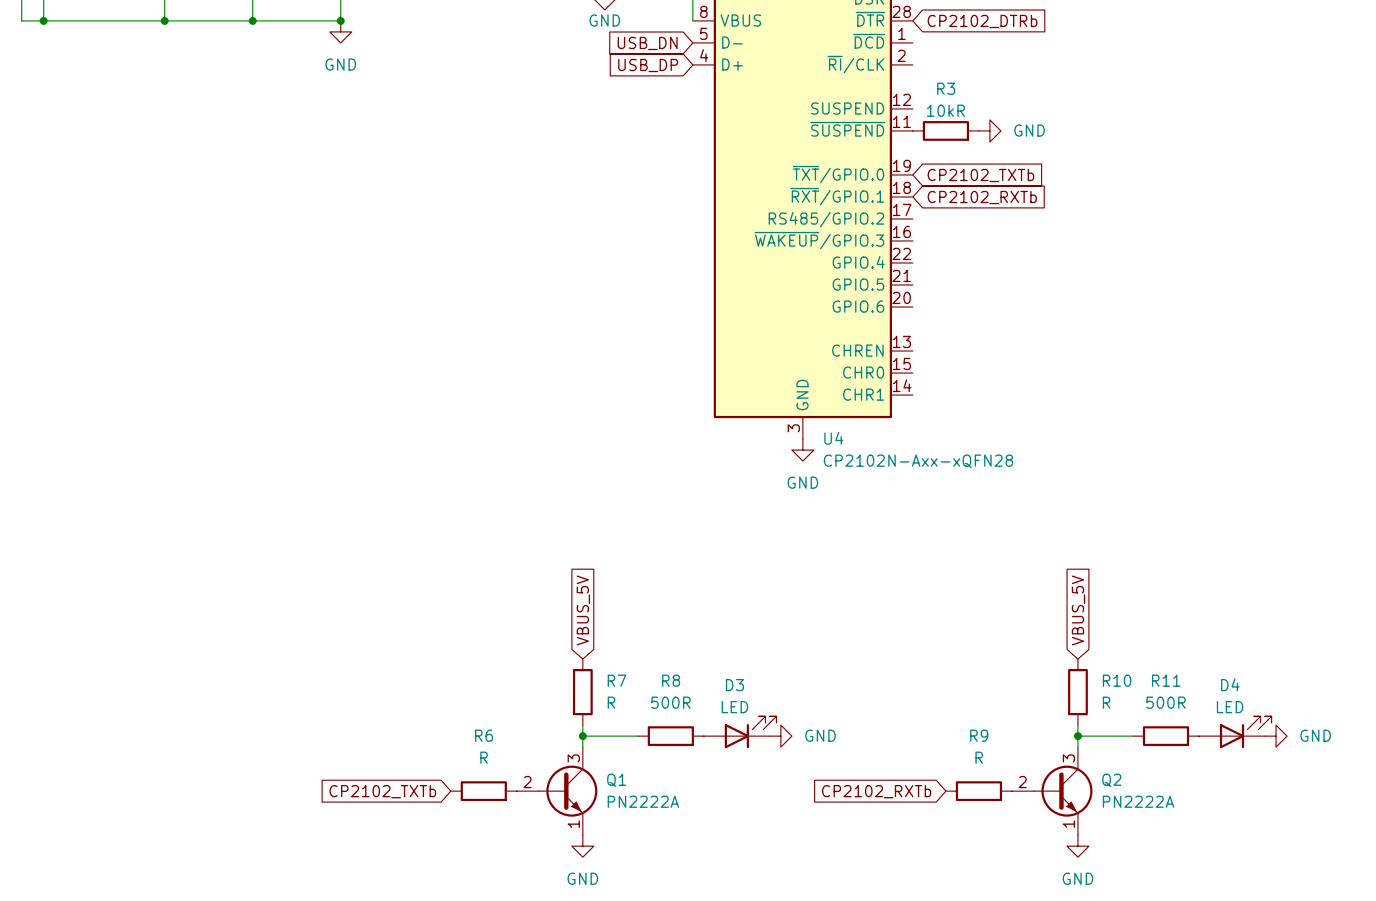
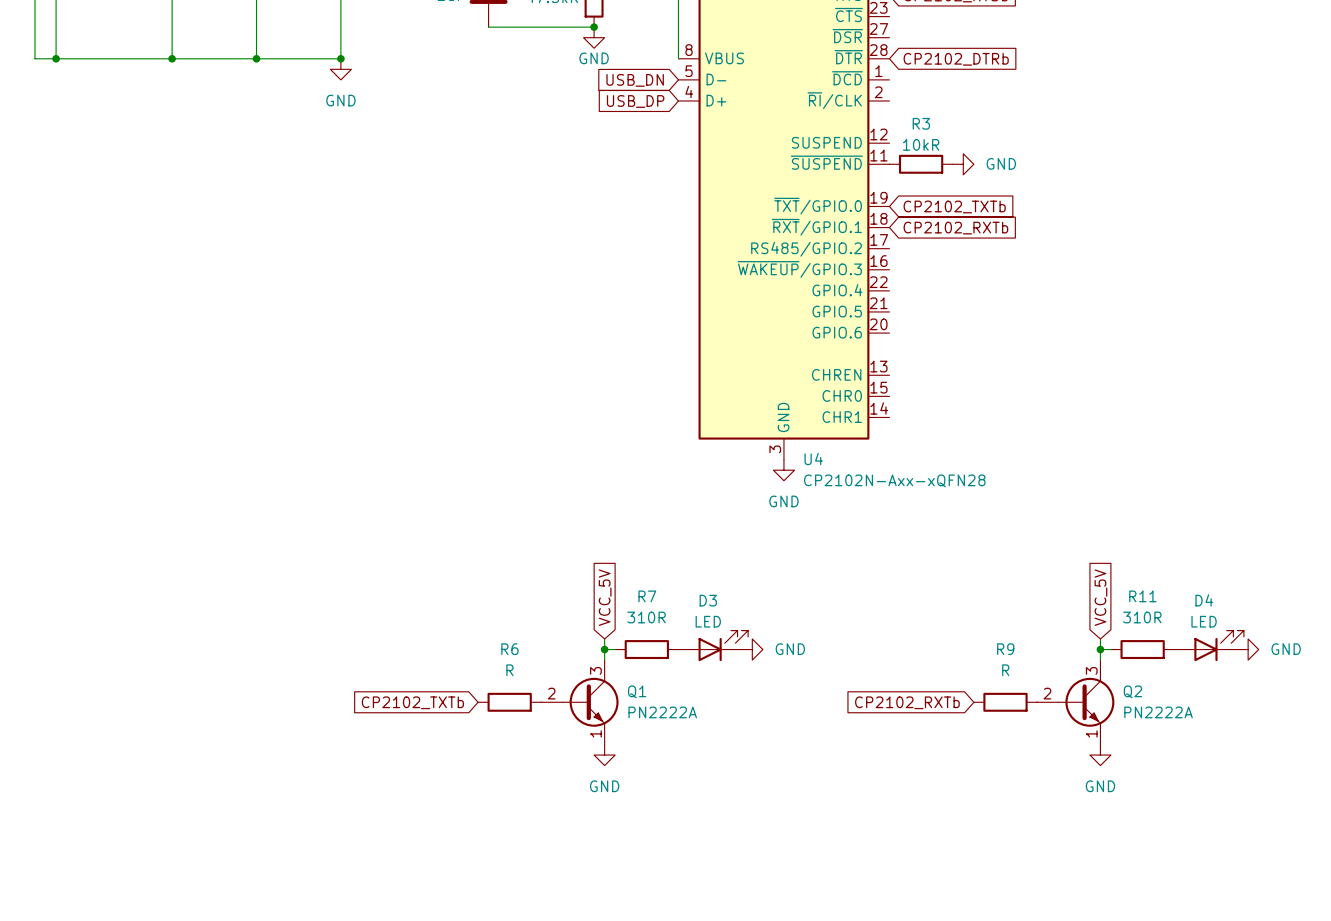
global label: none -> VCC_5V (605, 597)
global label: none -> VCC_5V (1100, 597)
global label: VBUS_5V (583, 610) -> none
global label: VBUS_5V (1078, 610) -> none
wire: none -> (604, 649) (615, 649)
junction: none -> (604, 649)
power symbol: none -> GND (752, 649)
wire: none -> (1100, 649) (1110, 649)
junction: none -> (1100, 649)
power symbol: none -> GND (1248, 649)
R7 name position: R7 (616, 680) -> R7 (647, 596)
R7 rotation: 0° (582, 692) -> 90° clockwise (646, 649)
R7 position: (582, 692) -> (646, 649)
R10: R (1077, 692) -> none
R7 value: R (611, 702) -> 310R (646, 617)
R11 value: 500R (1165, 702) -> 310R (1142, 617)
wire: (582, 725) (582, 747) -> (604, 638) (604, 660)
wire: (1077, 725) (1077, 747) -> (1100, 638) (1100, 660)
D3 position: (740, 732) -> (713, 645)
D4 position: (1235, 732) -> (1209, 645)
wire: (582, 736) (637, 736) -> none
junction: (582, 736) -> none
R8: 500R (670, 736) -> none
power symbol: GND (780, 736) -> none
wire: (1077, 736) (1132, 736) -> none
junction: (1077, 736) -> none
R11 position: (1165, 736) -> (1142, 649)
power symbol: GND (1276, 736) -> none
power symbol: none -> GND (604, 755)
power symbol: none -> GND (1100, 755)
global label position: CP2102_TXTb (382, 791) -> CP2102_TXTb (412, 702)
R6 position: (483, 791) -> (509, 702)
Q1 position: (557, 791) -> (579, 702)
global label position: CP2102_RXTb (876, 791) -> CP2102_RXTb (907, 702)
R9 position: (978, 791) -> (1005, 702)
Q2 position: (1052, 791) -> (1075, 702)
power symbol: GND (582, 846) -> none
power symbol: GND (1077, 846) -> none

